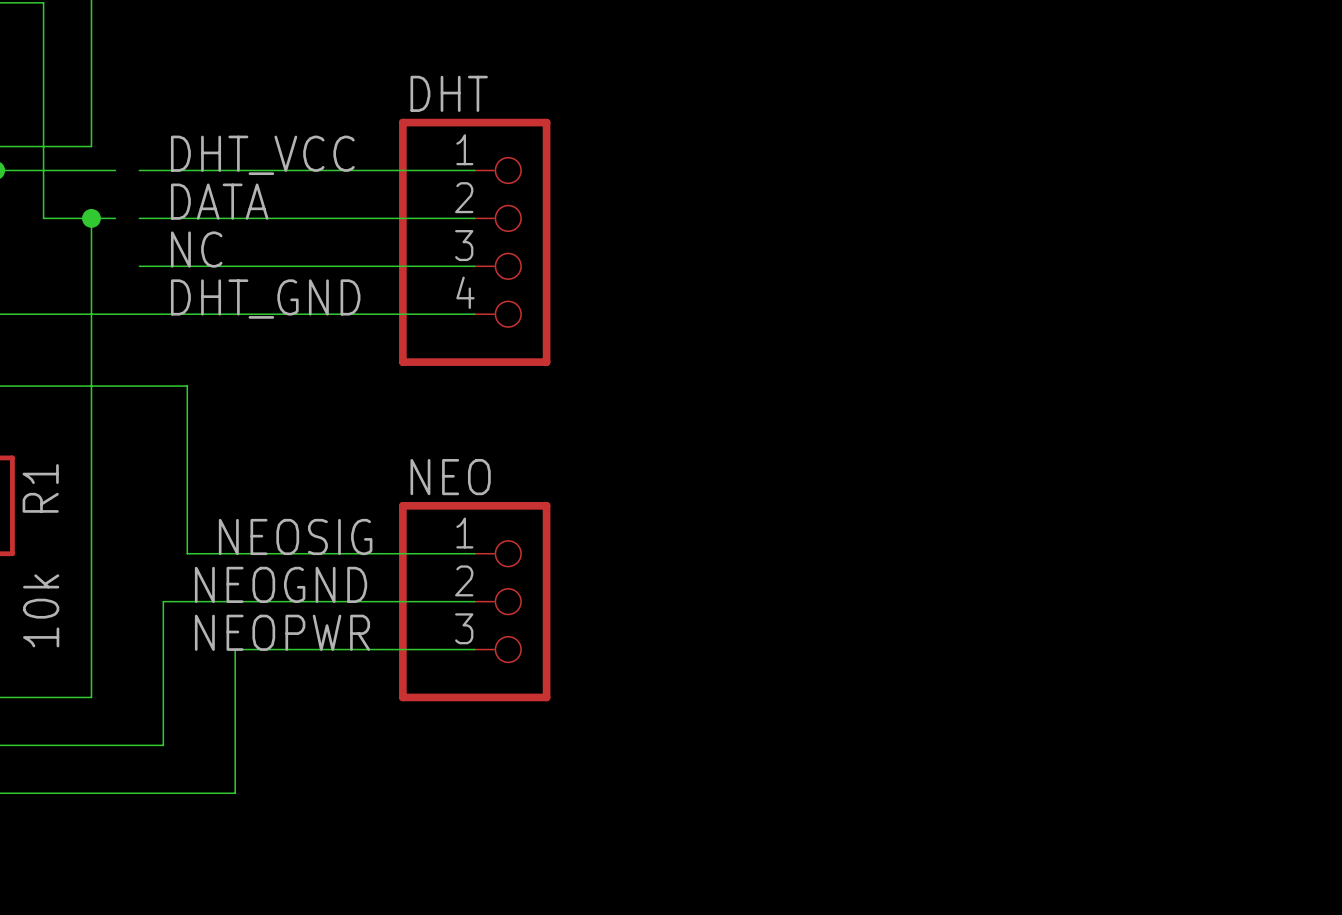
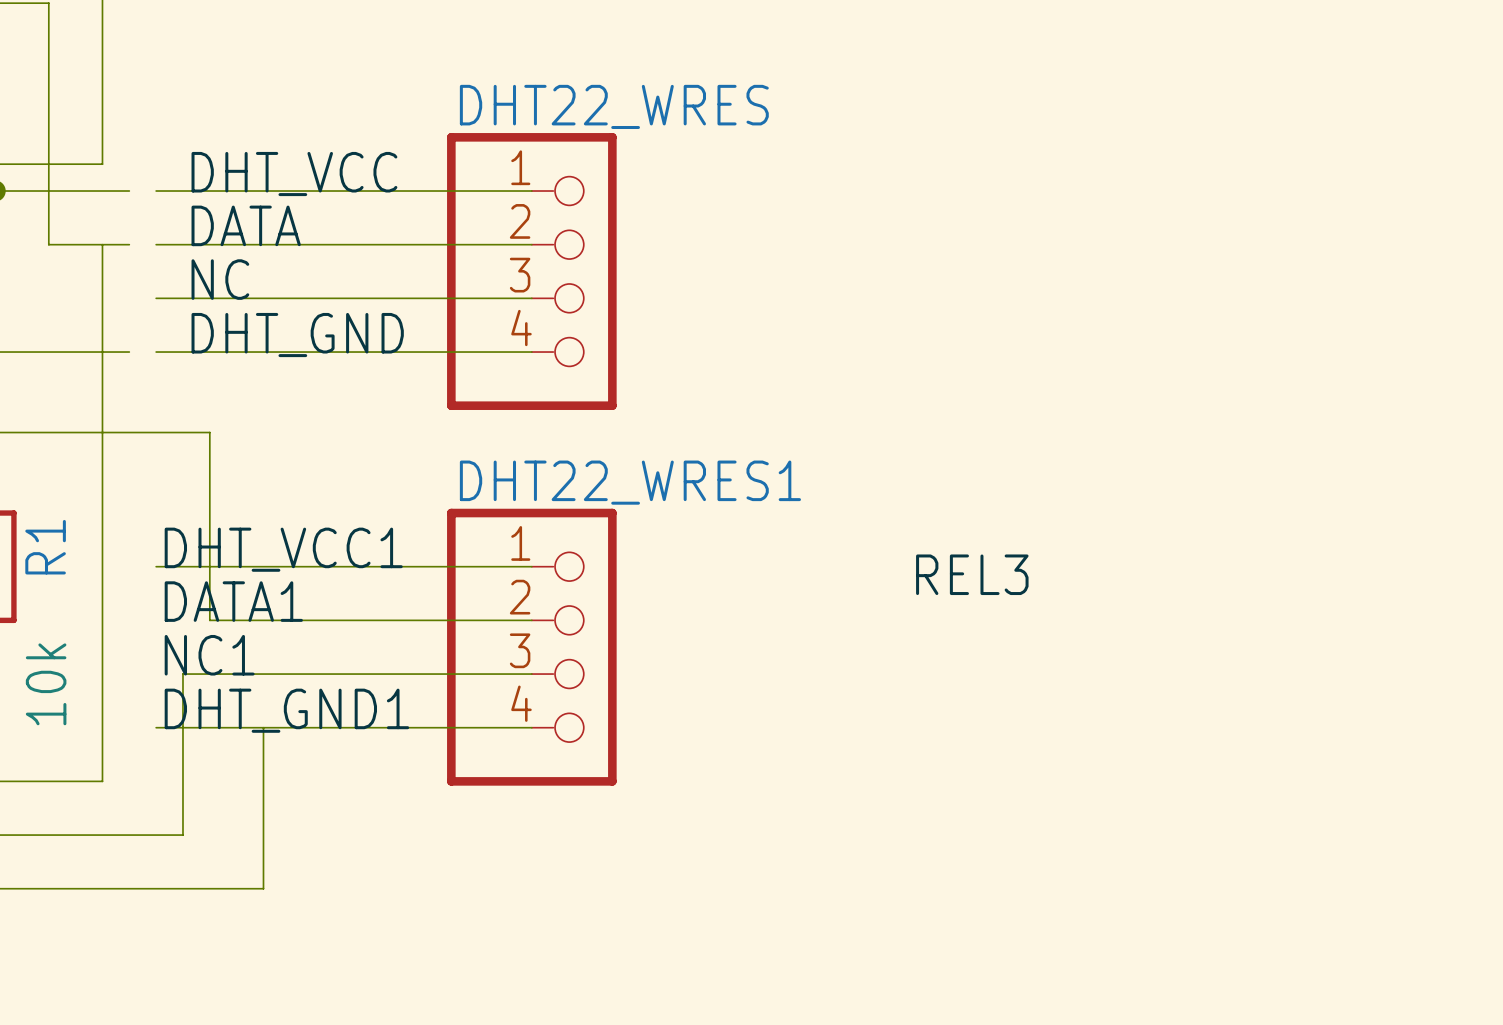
DHT name: DHT (449, 93) -> DHT22_WRES (614, 106)
junction: (91, 218) -> none
wire: (115, 314) (139, 314) -> none
label: none -> DHT_VCC1 (283, 549)
wire: none -> (156, 566) (531, 566)
label: none -> REL3 (972, 574)
label: none -> DATA1 (233, 601)
label: NEOSIG (295, 536) -> none
DHT22_WRES1: none -> (531, 647)
label: none -> NC1 (209, 655)
label: NEOGND (281, 584) -> none
NEO: (474, 601) -> none
label: NEOPWR (282, 632) -> none
label: none -> DHT_GND1 (286, 710)
wire: none -> (156, 727) (263, 727)

